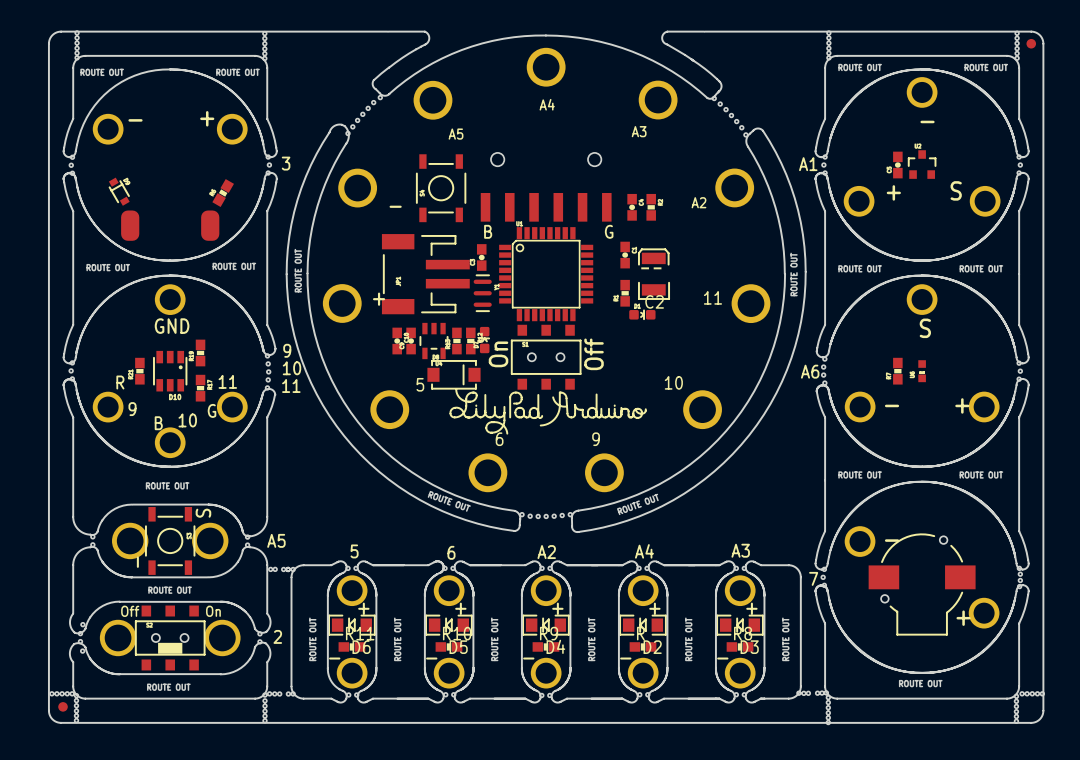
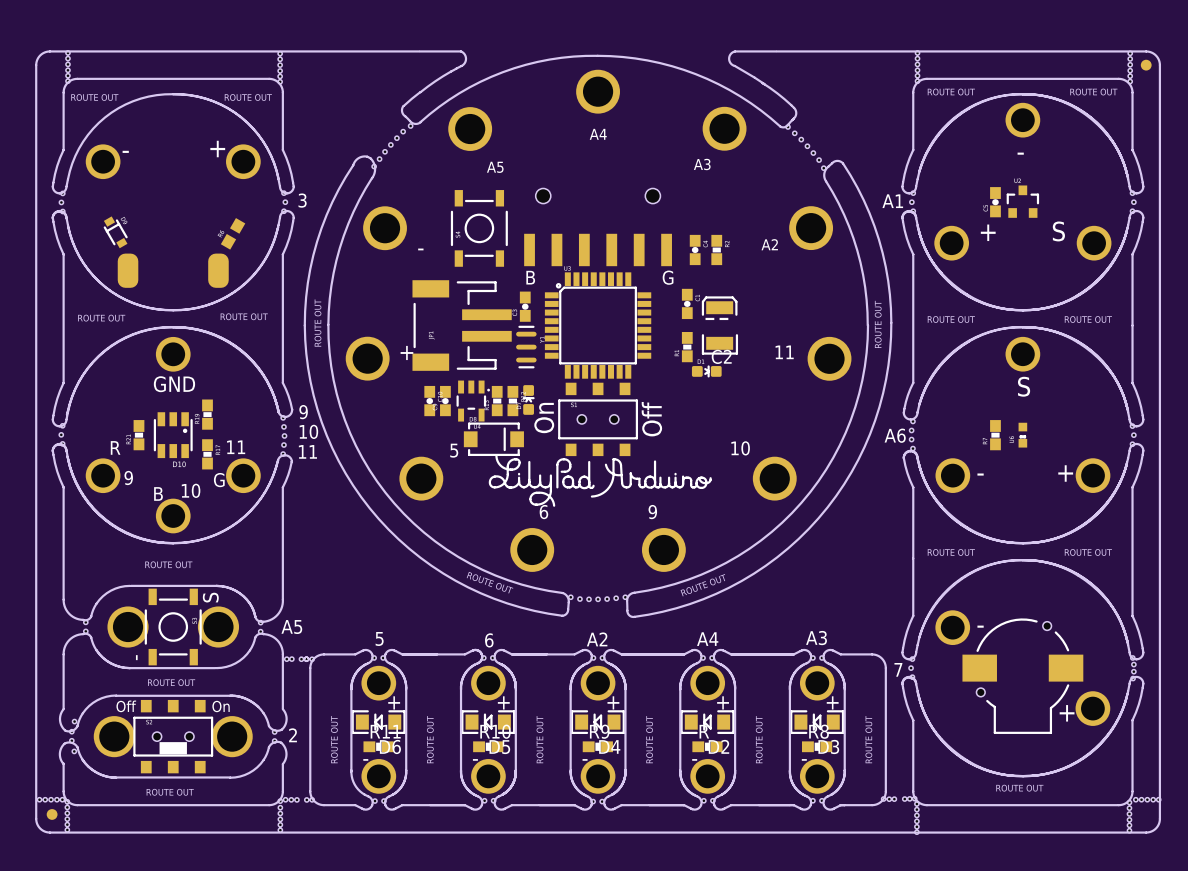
part footprint: [212, 179, 234, 208] -> [220, 218, 246, 250]
part: (546, 274) -> none
part: none -> (598, 325)
part footprint: [419, 322, 449, 360] -> [456, 380, 490, 422]

